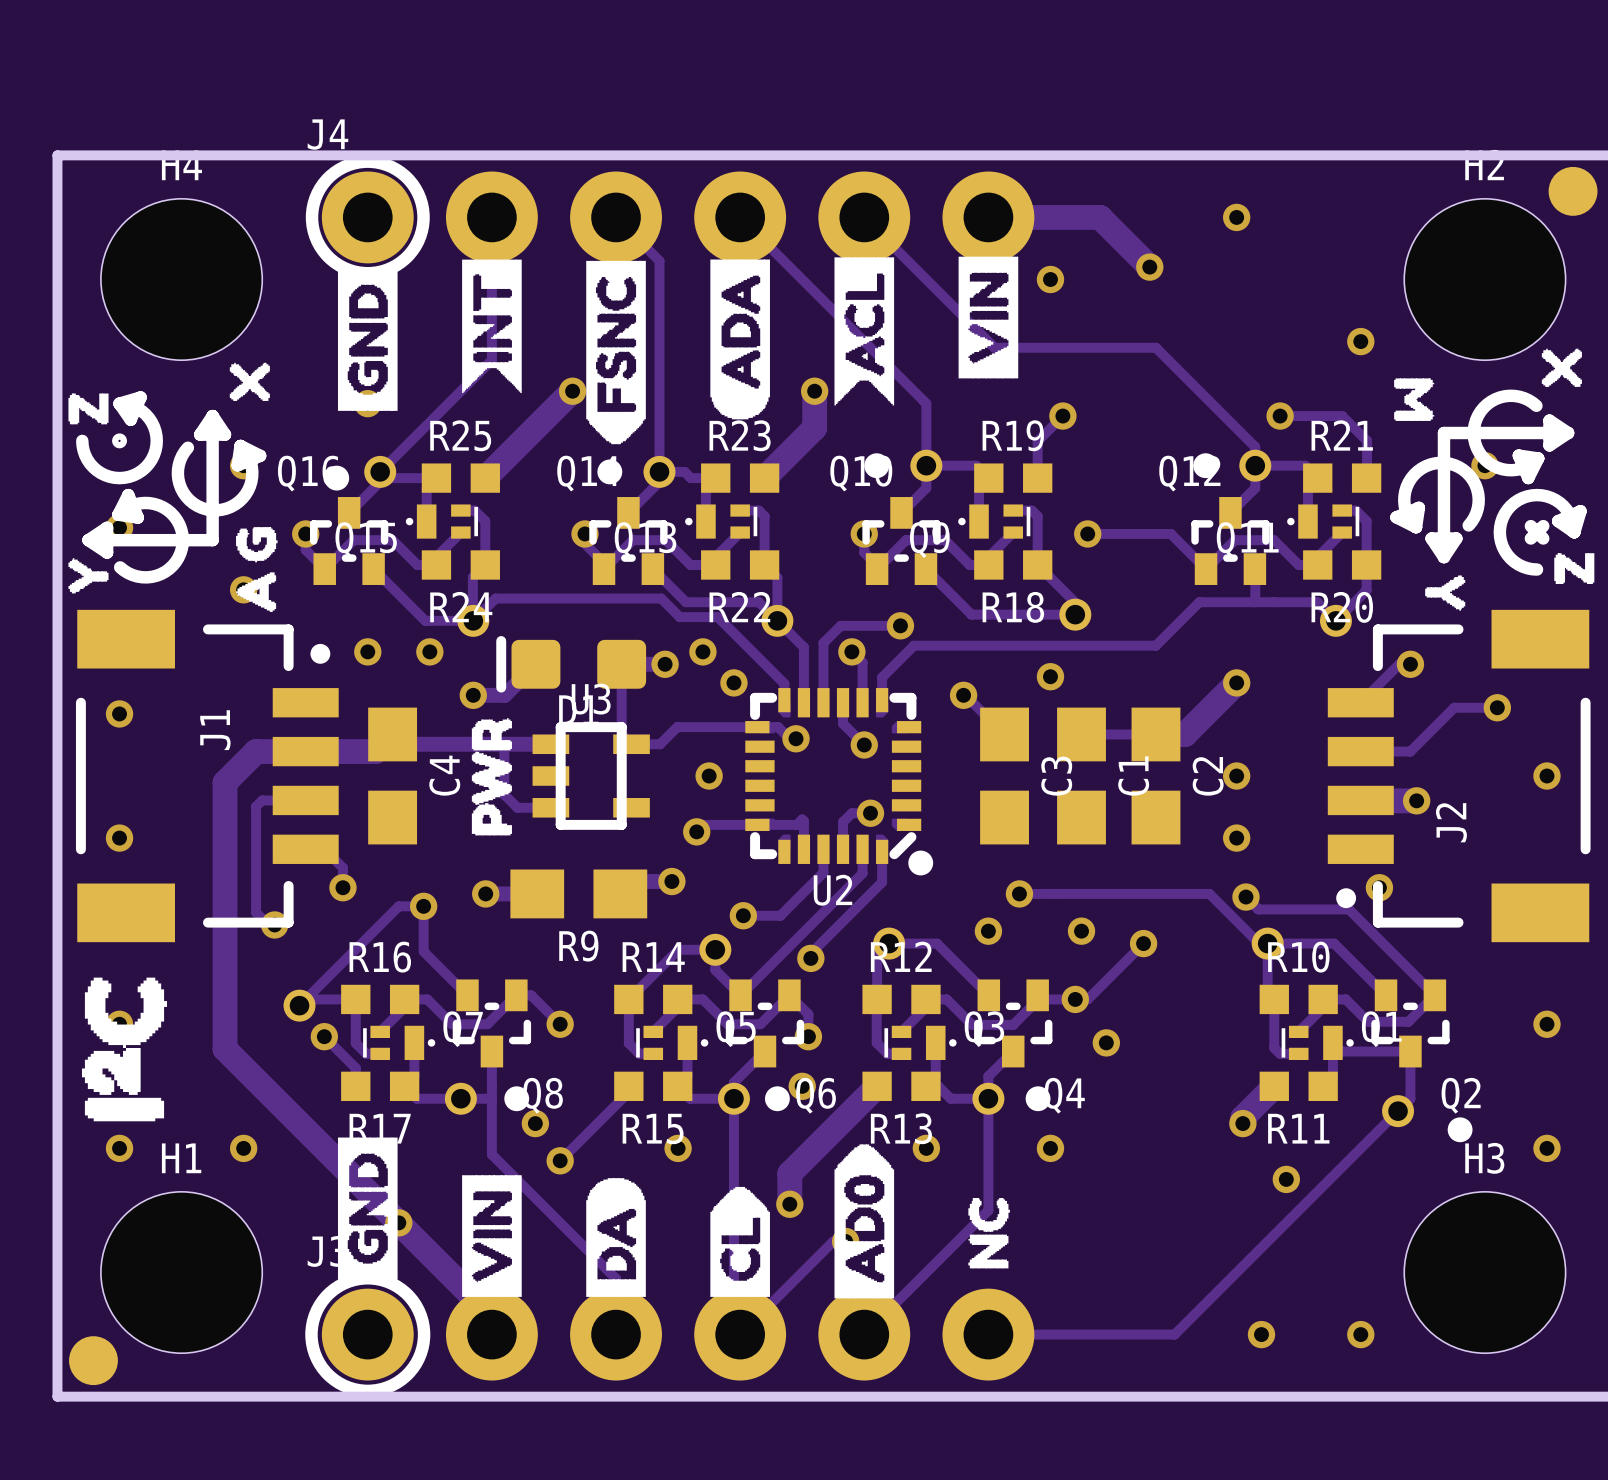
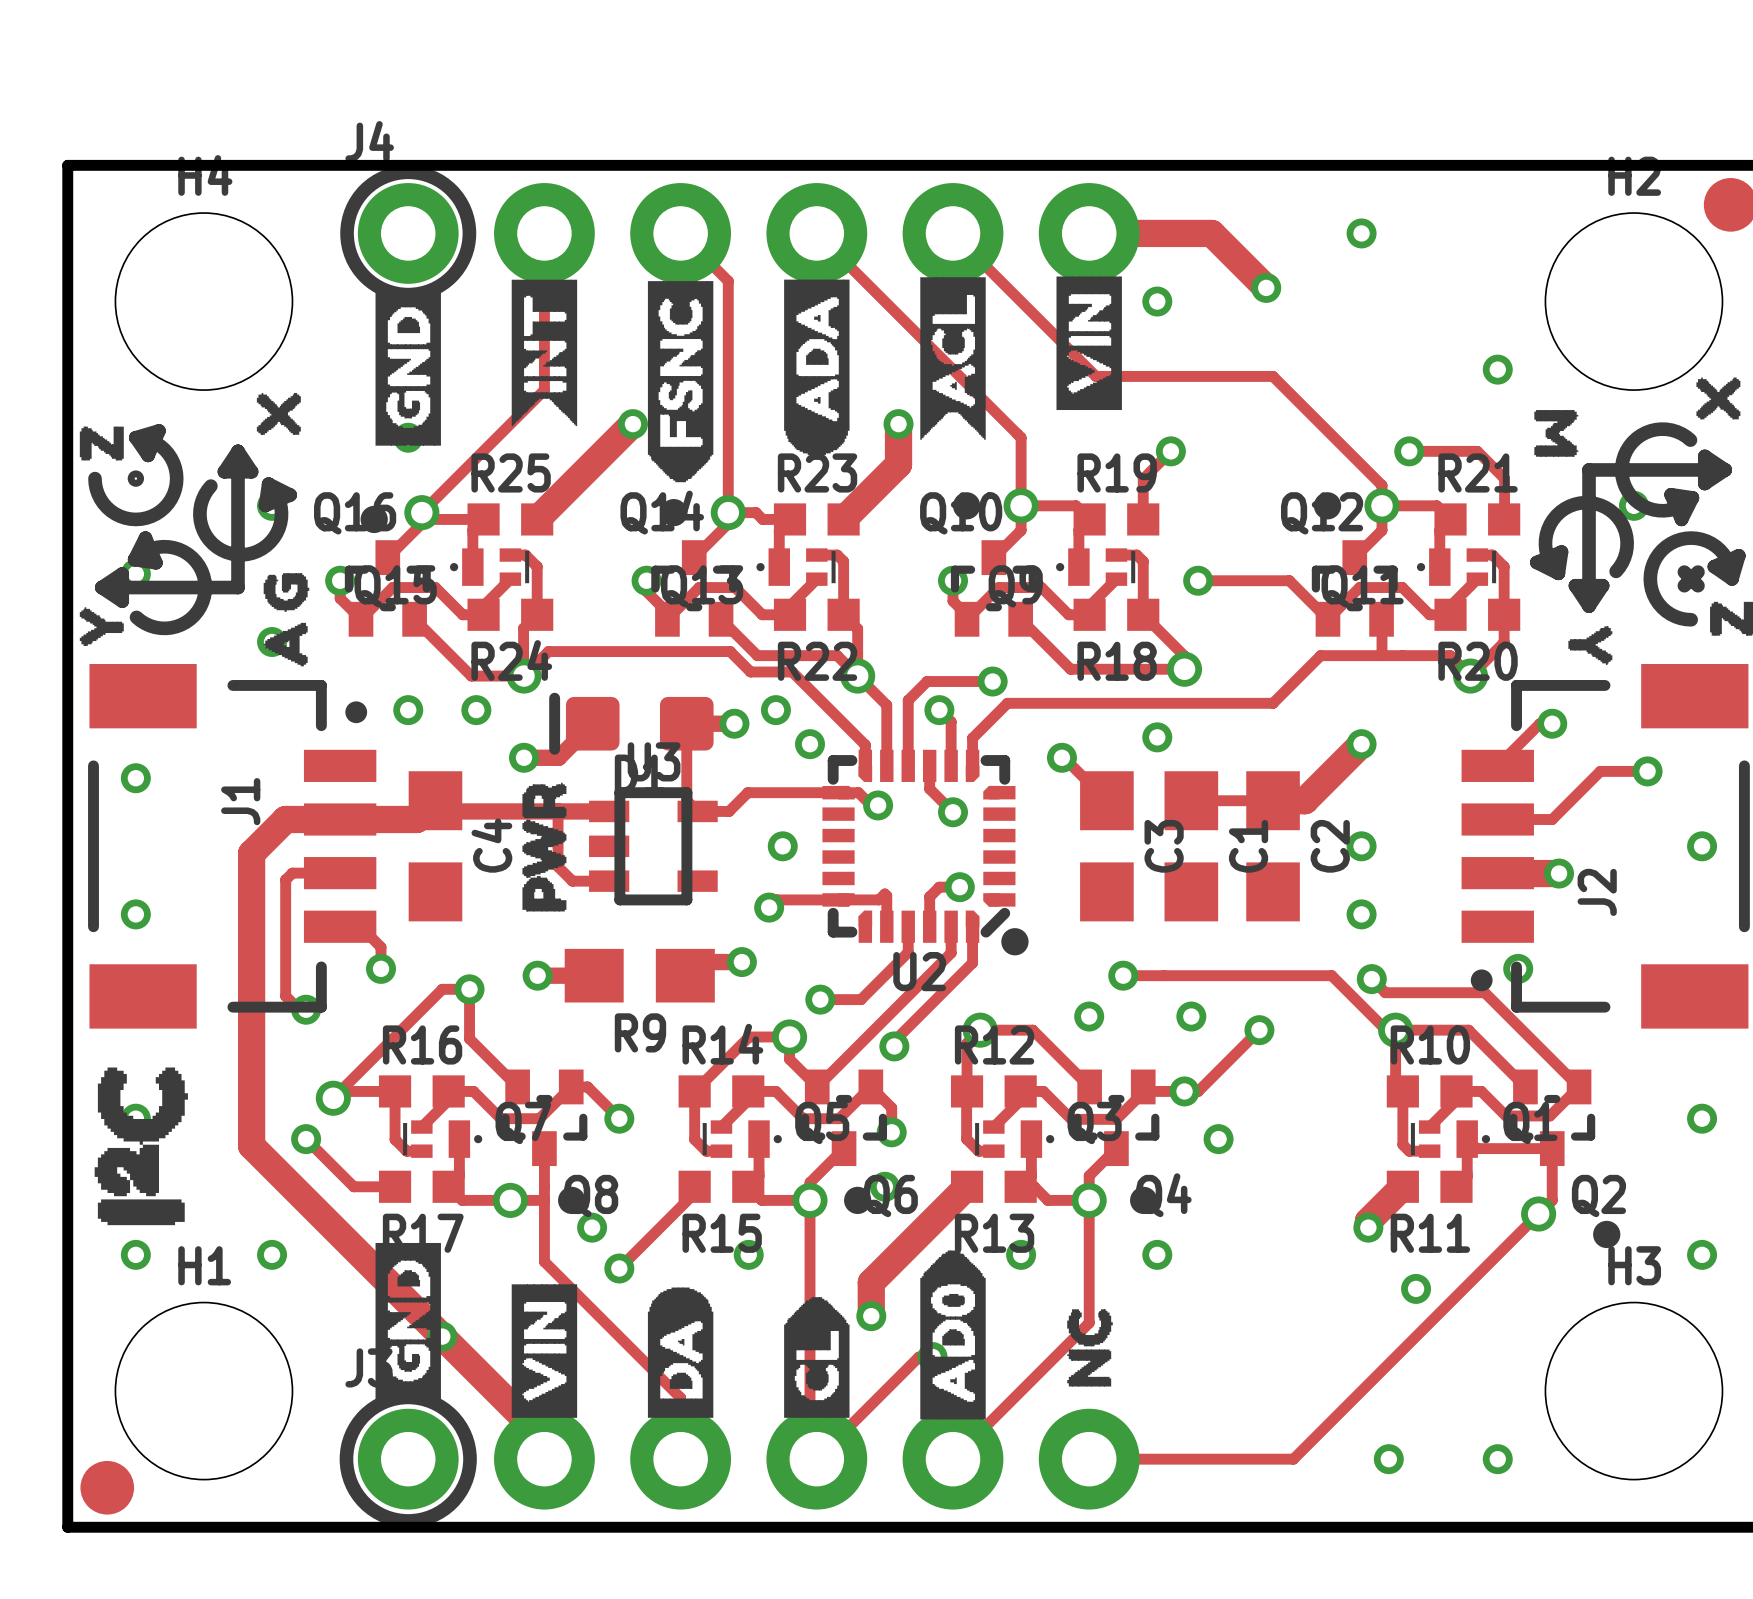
track: (324, 1036) (355, 1068) (355, 1086) -> (306, 1139) (353, 1186) (395, 1186)
via position: (324, 1036) -> (306, 1139)

